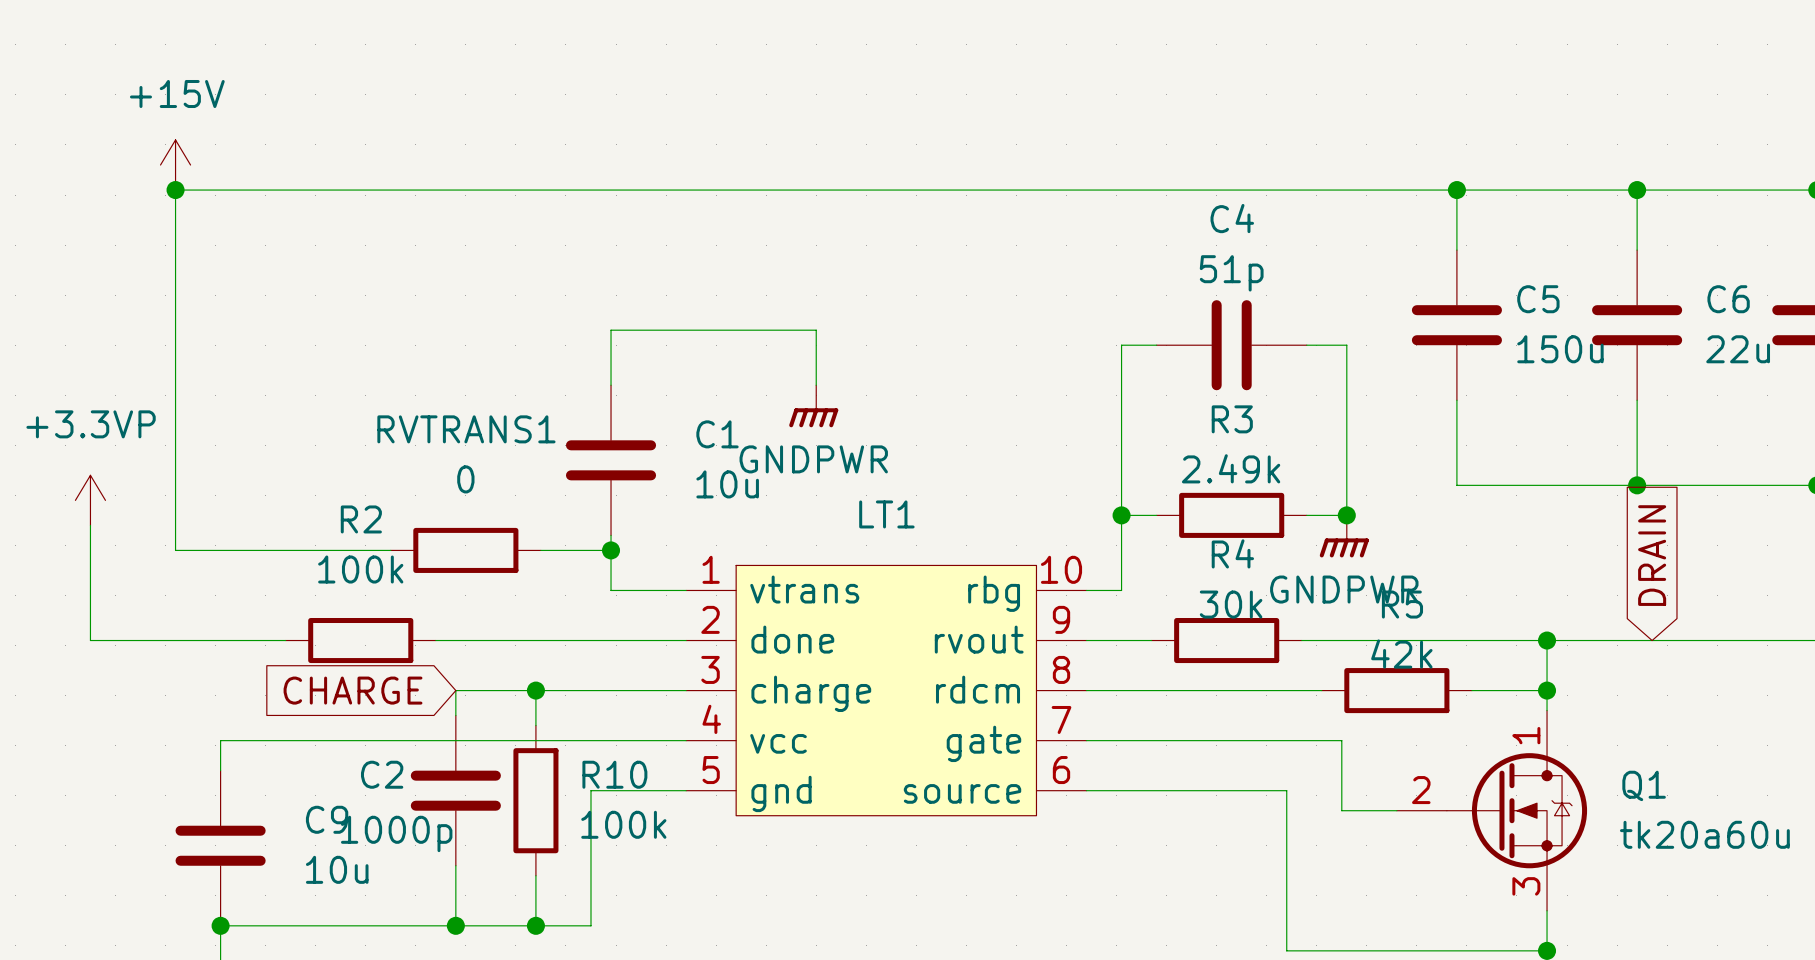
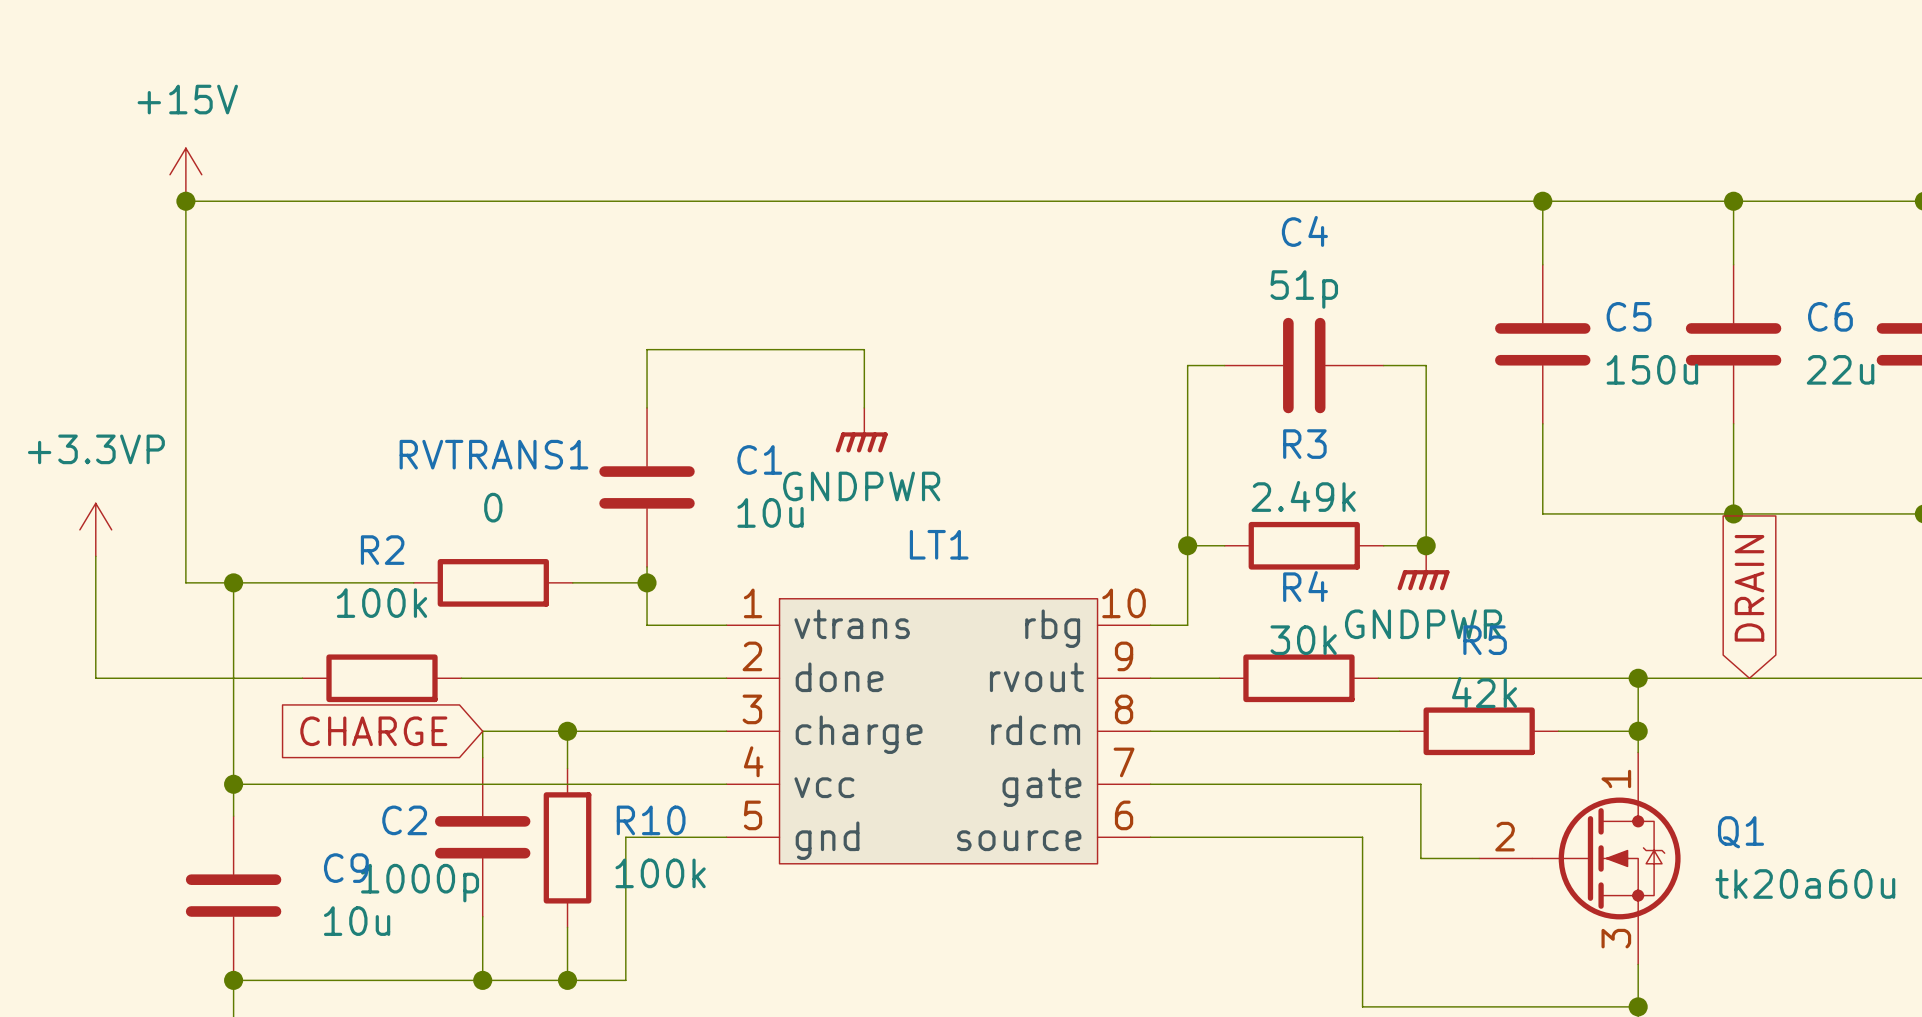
wire: none -> (233, 582) (233, 784)
junction: none -> (233, 582)
junction: none -> (233, 784)

